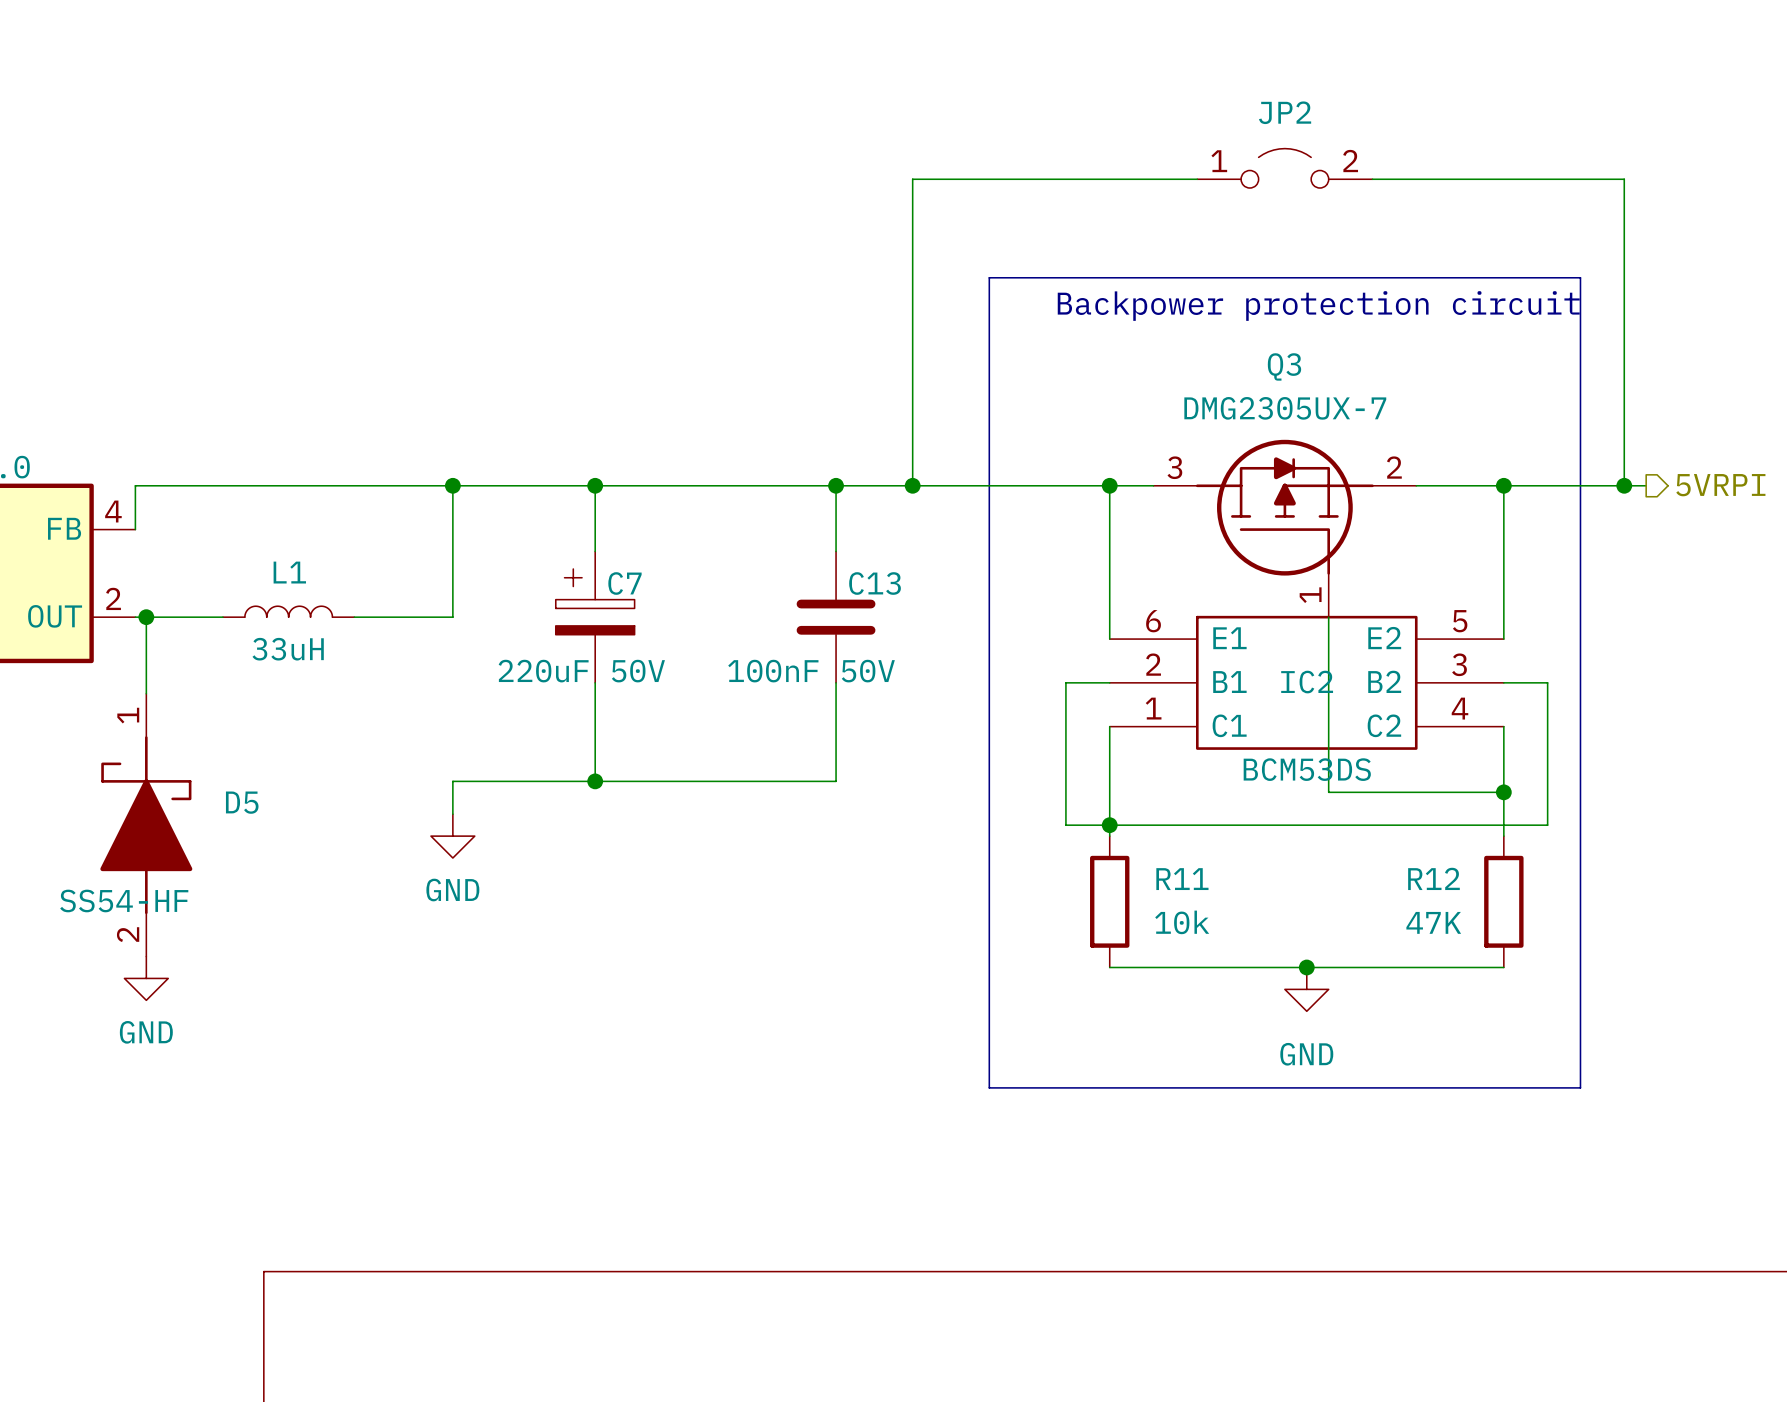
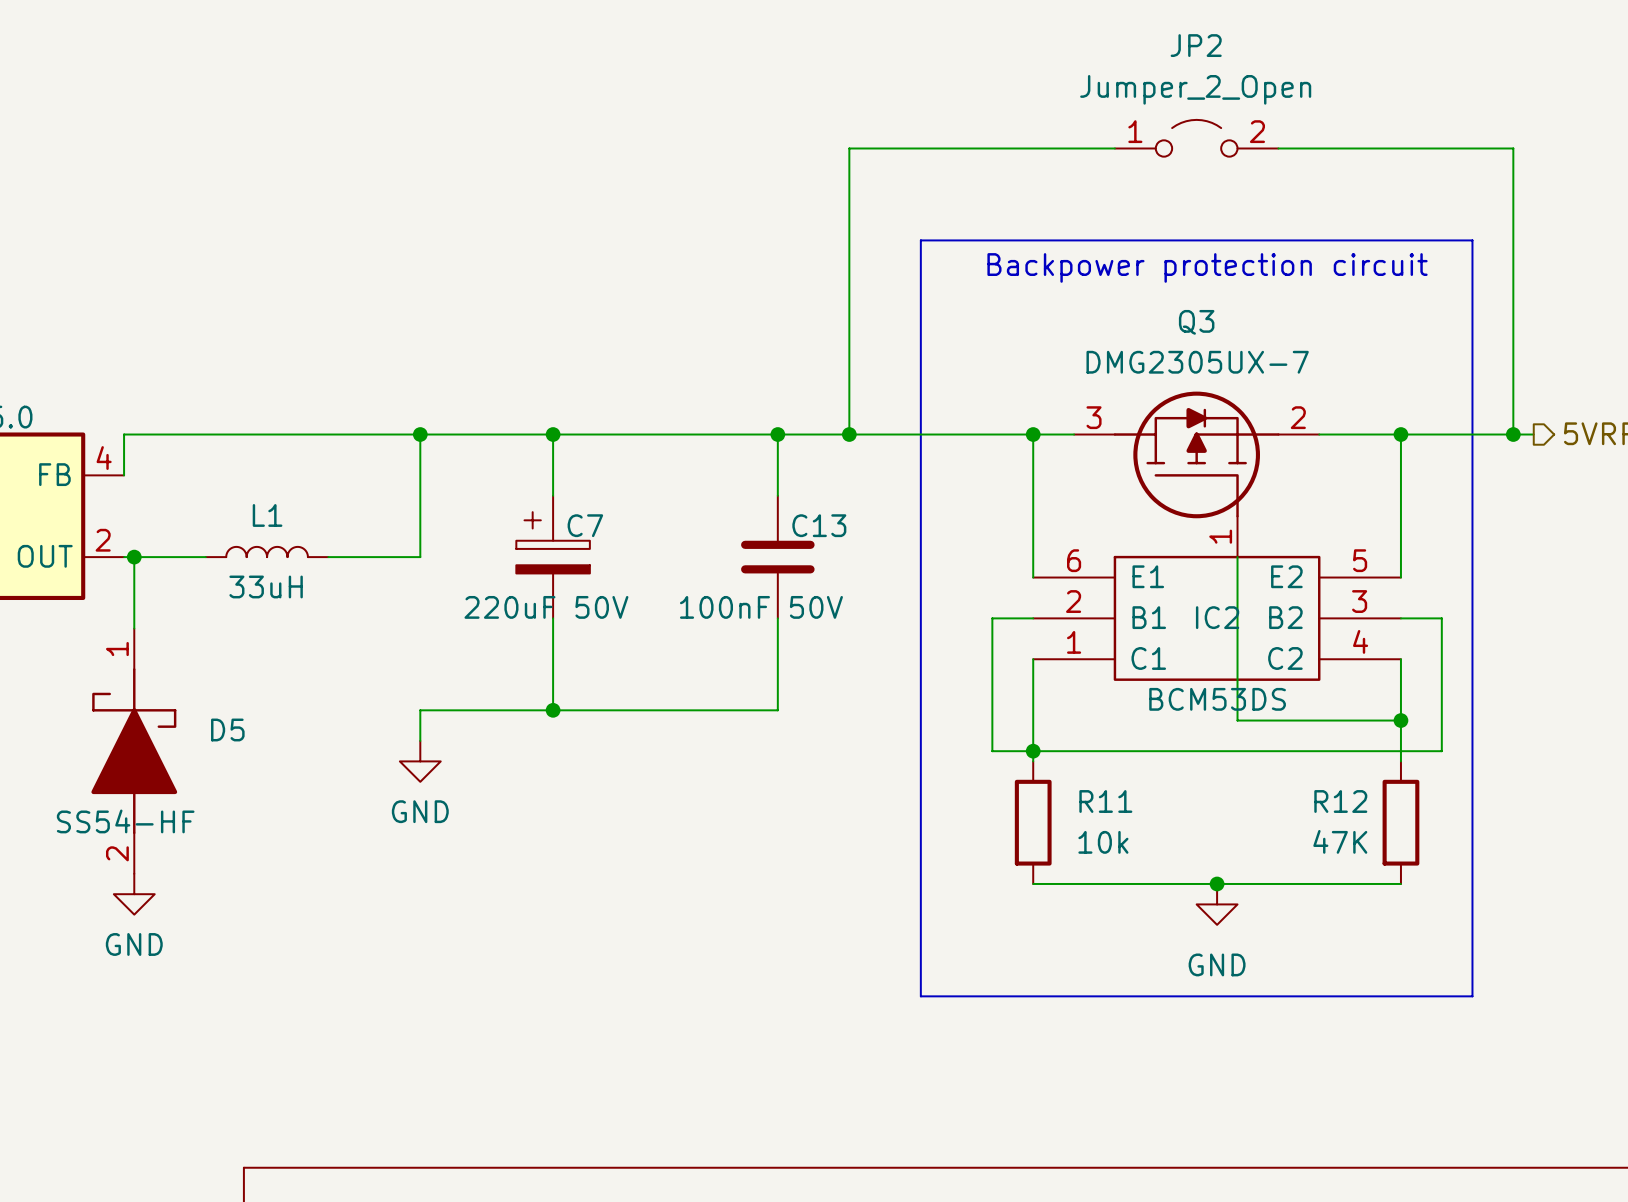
JP2 name position: JP2 (1285, 112) -> JP2 (1196, 45)
JP2 value: none -> Jumper_2_Open (1195, 89)

